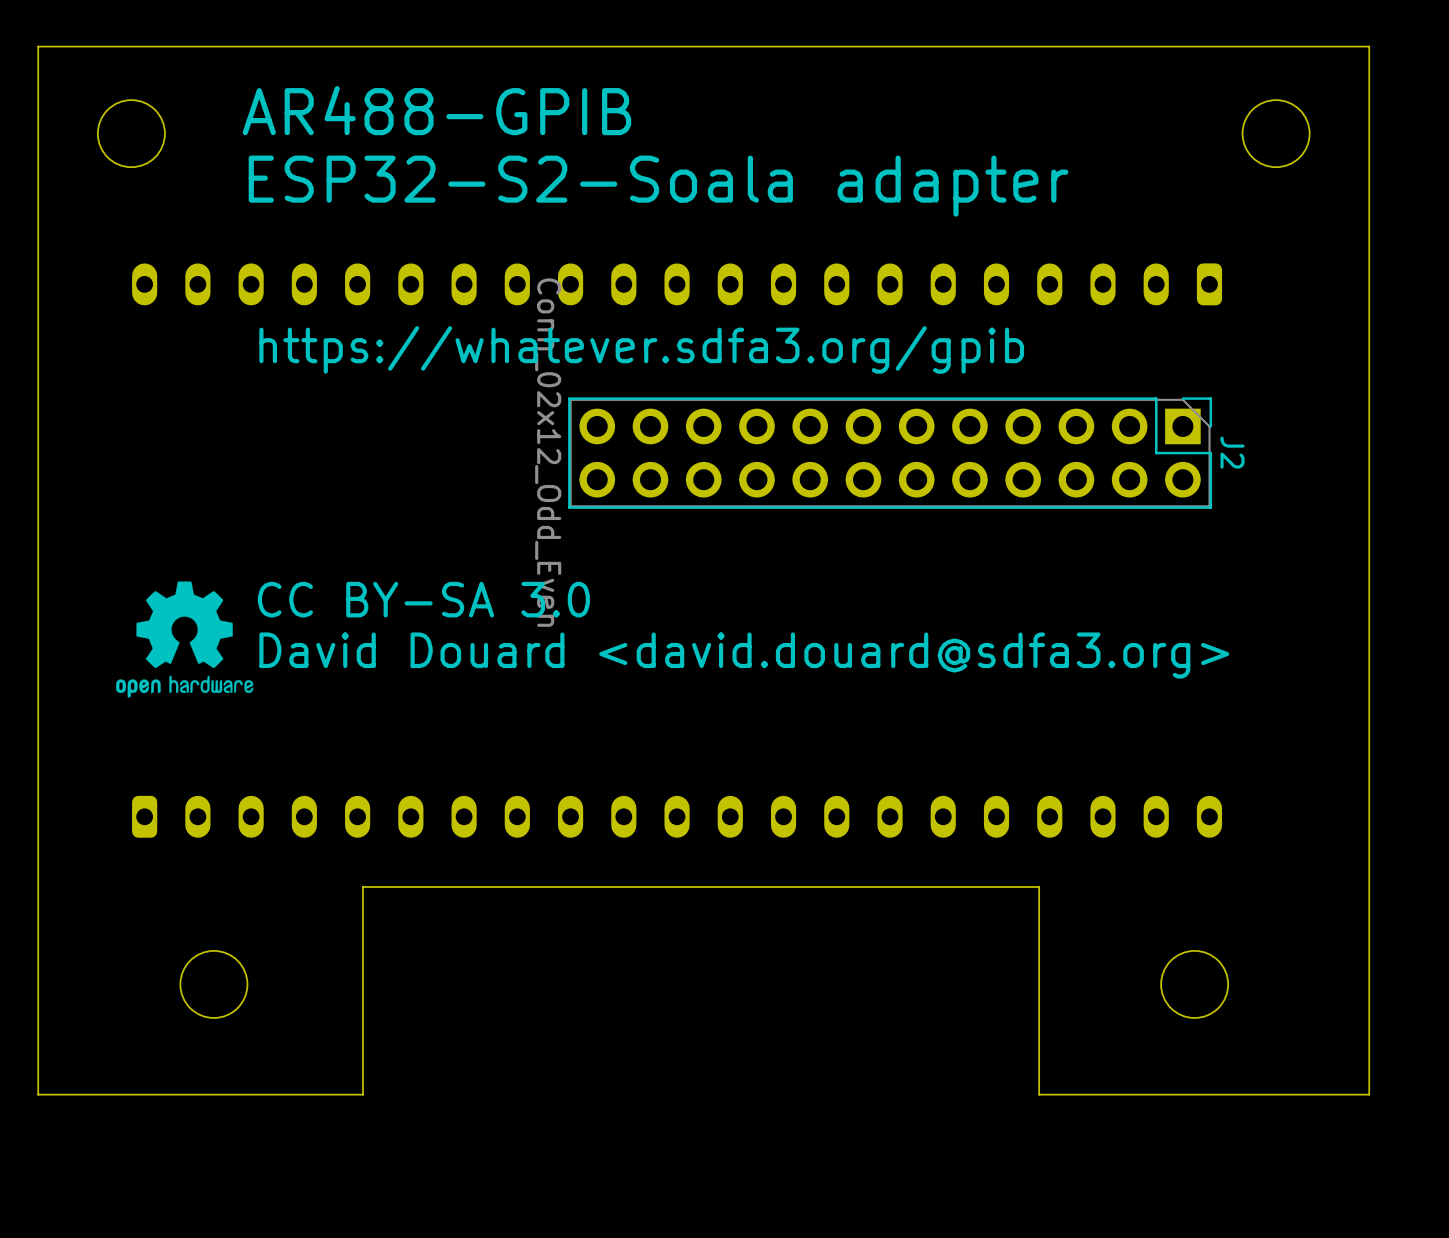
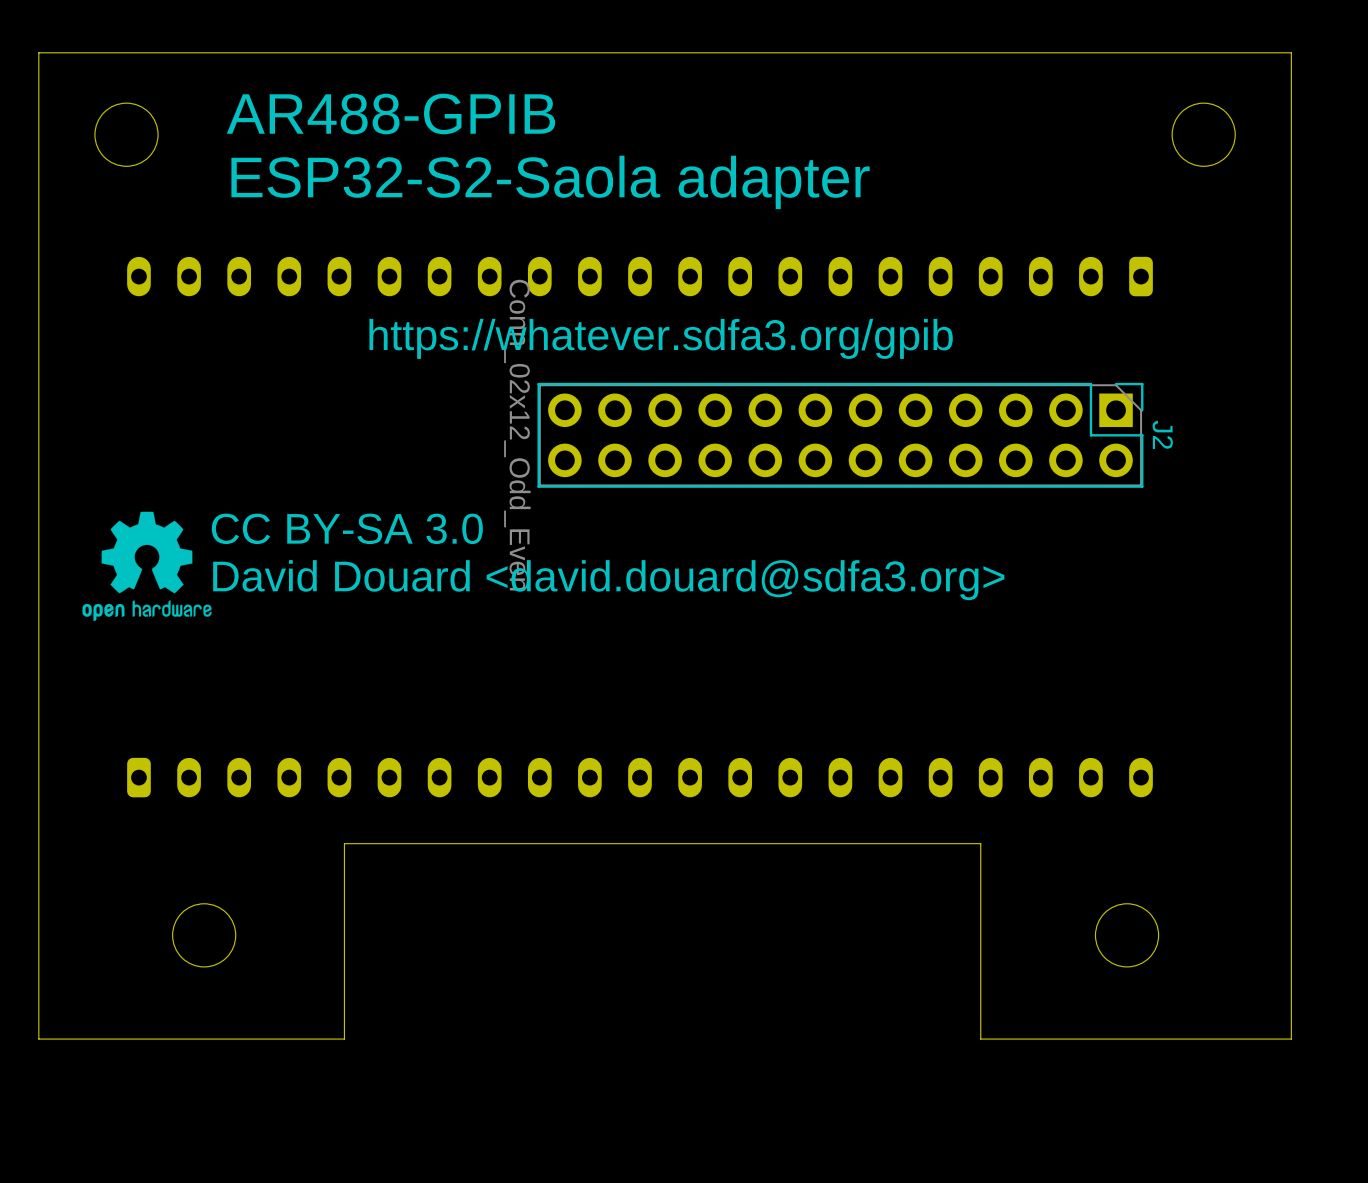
text: ESP32-S2-Soala adapter (658, 186) -> ESP32-S2-Saola adapter (550, 182)
text position: https://whatever.sdfa3.org/gpib (641, 349) -> https://whatever.sdfa3.org/gpib (661, 338)
text position: CC BY-SA 3.0 (423, 599) -> CC BY-SA 3.0 (347, 528)
drawing position: (184, 639) -> (147, 566)
text position: David Douard <david.douard@sdfa3.org> (744, 655) -> David Douard <david.douard@sdfa3.org> (608, 580)

